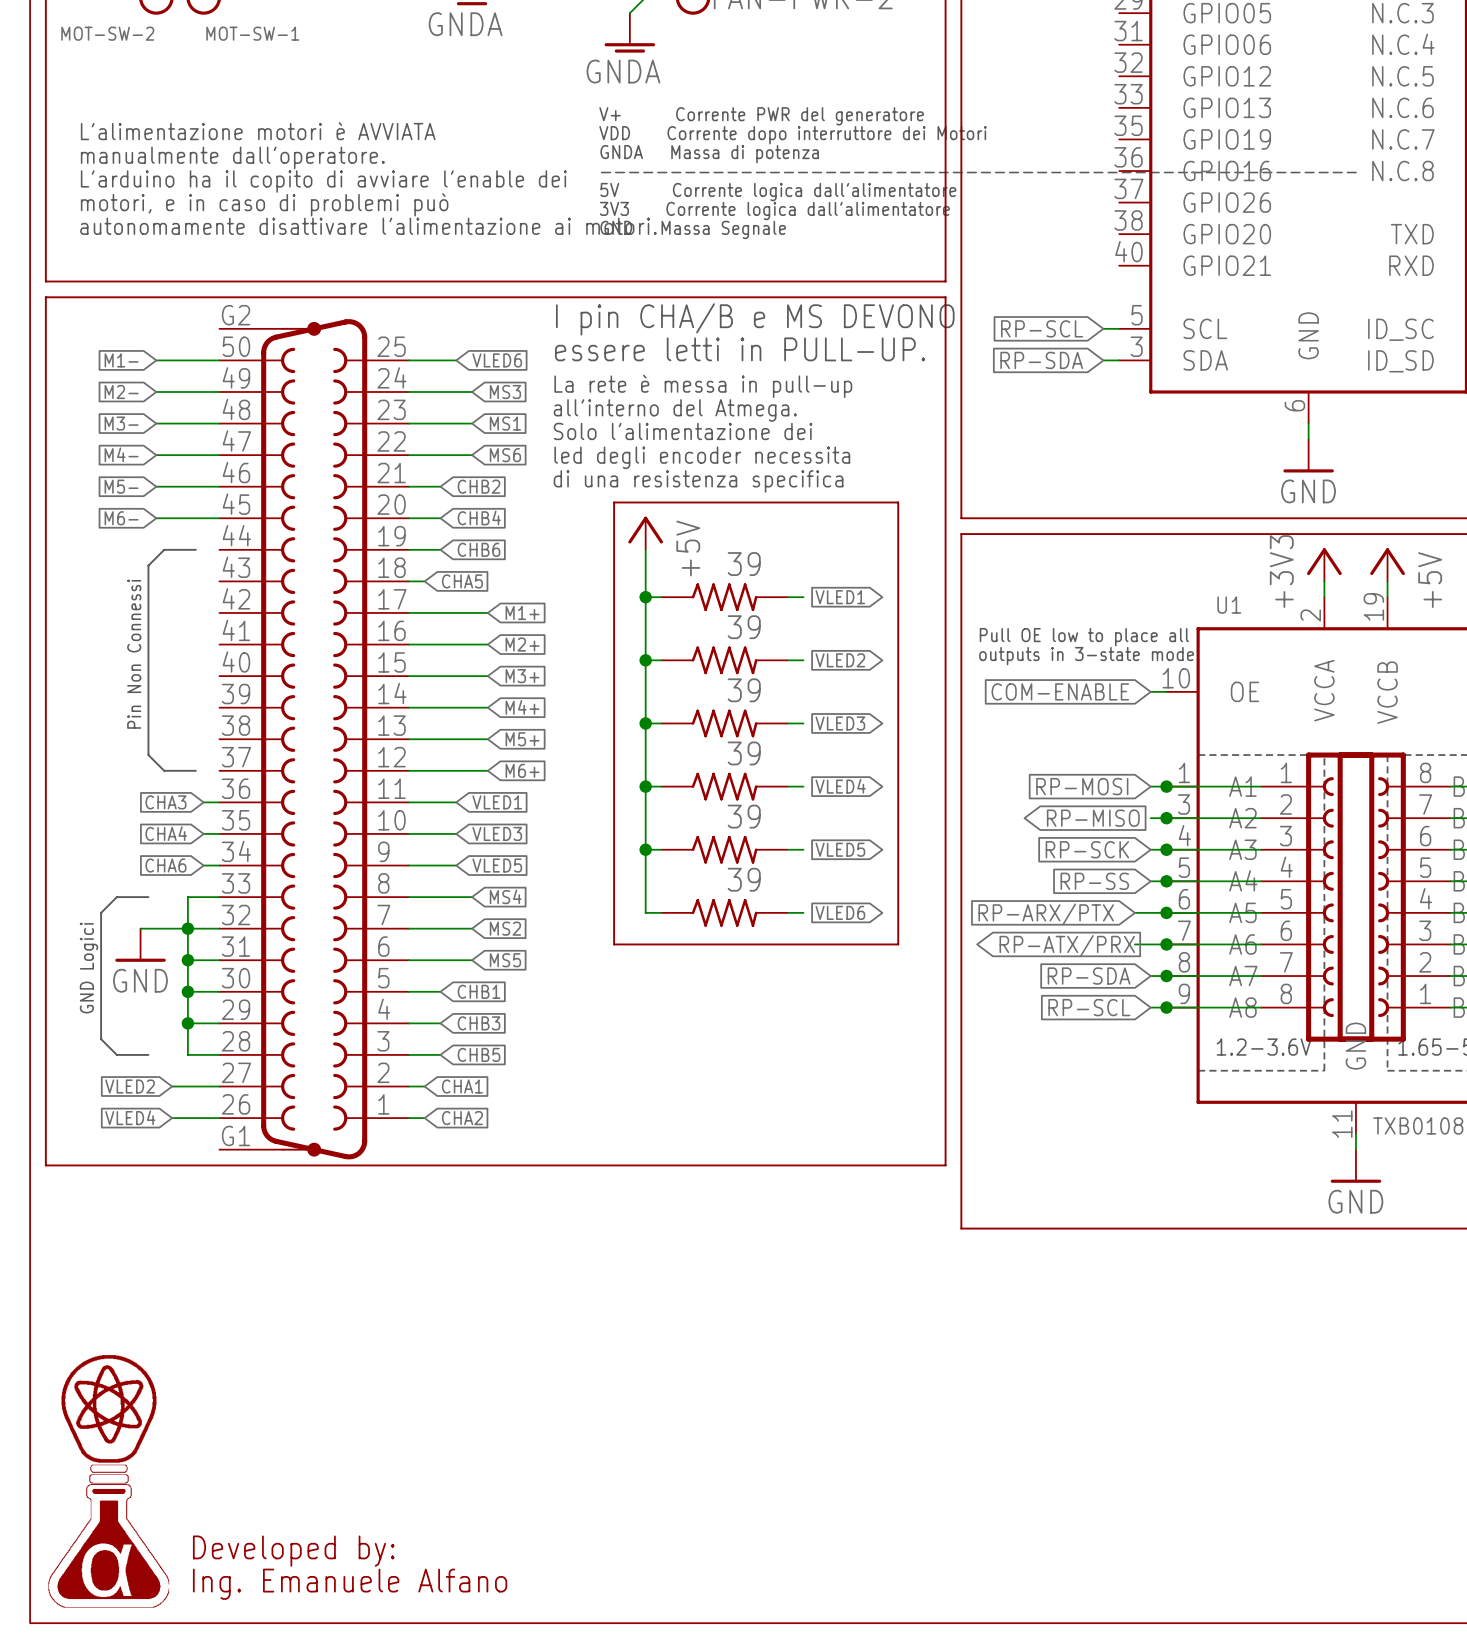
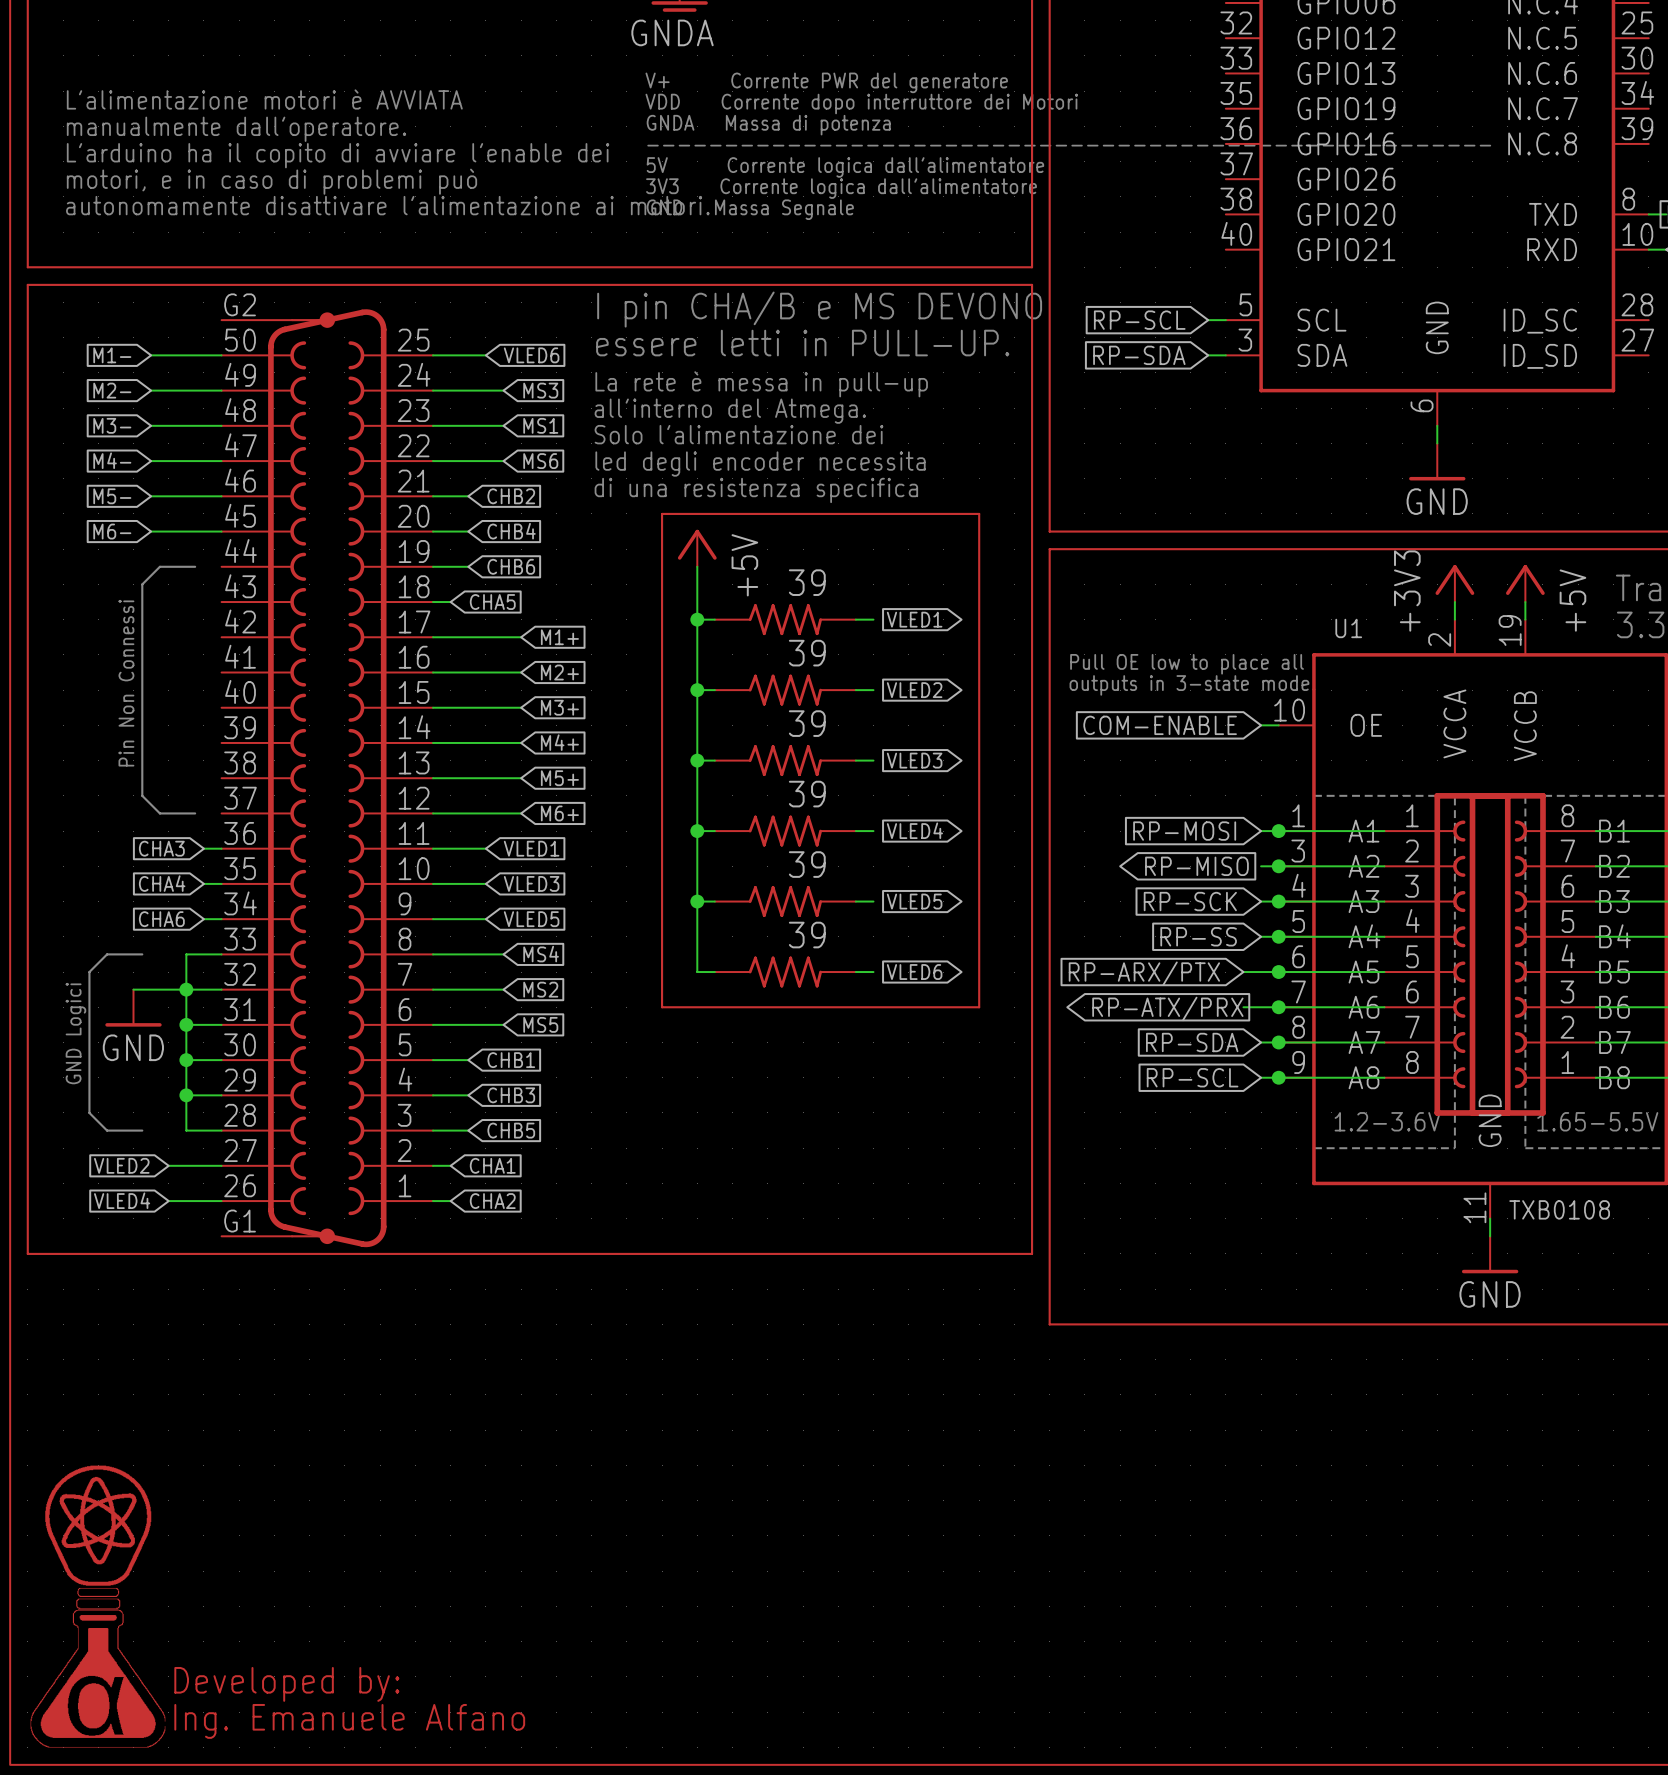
text position: Developed by: (293, 1551) -> Developed by: (286, 1684)
text position: Ing. Emanuele Alfano (350, 1584) -> Ing. Emanuele Alfano (349, 1721)

